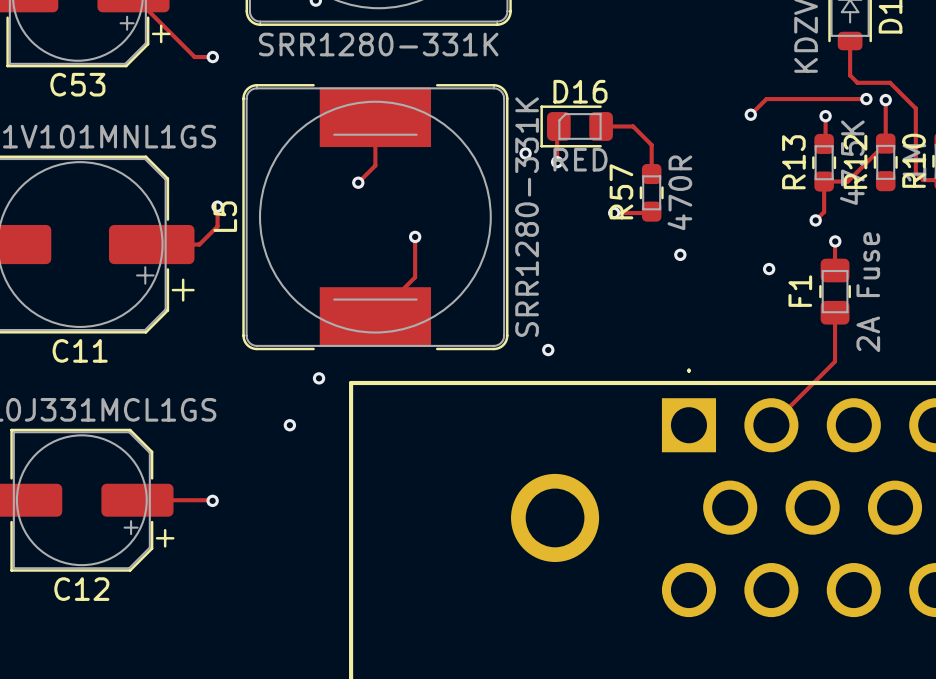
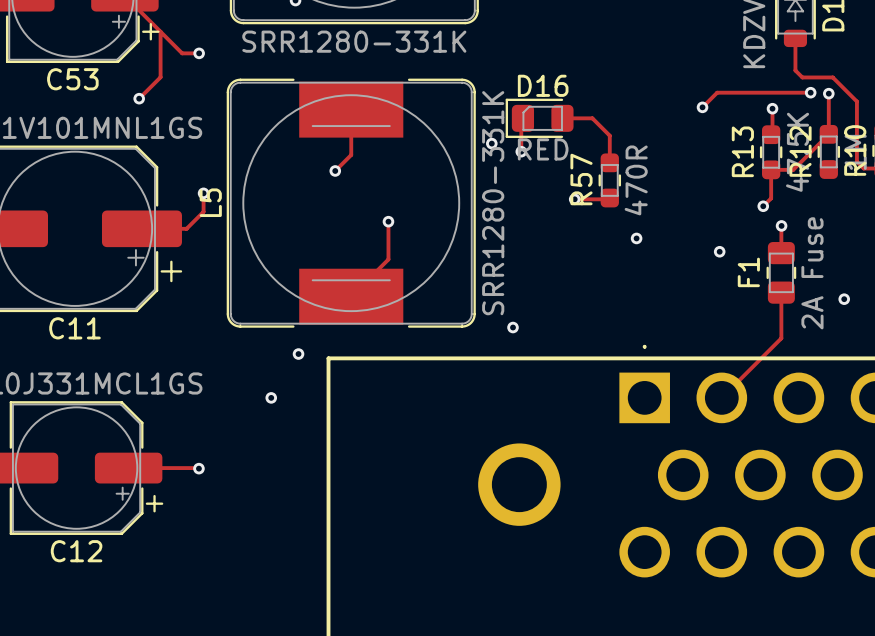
track: none -> (160, 31) (160, 77) (139, 98)
via: none -> (139, 98)
via: none -> (844, 299)

